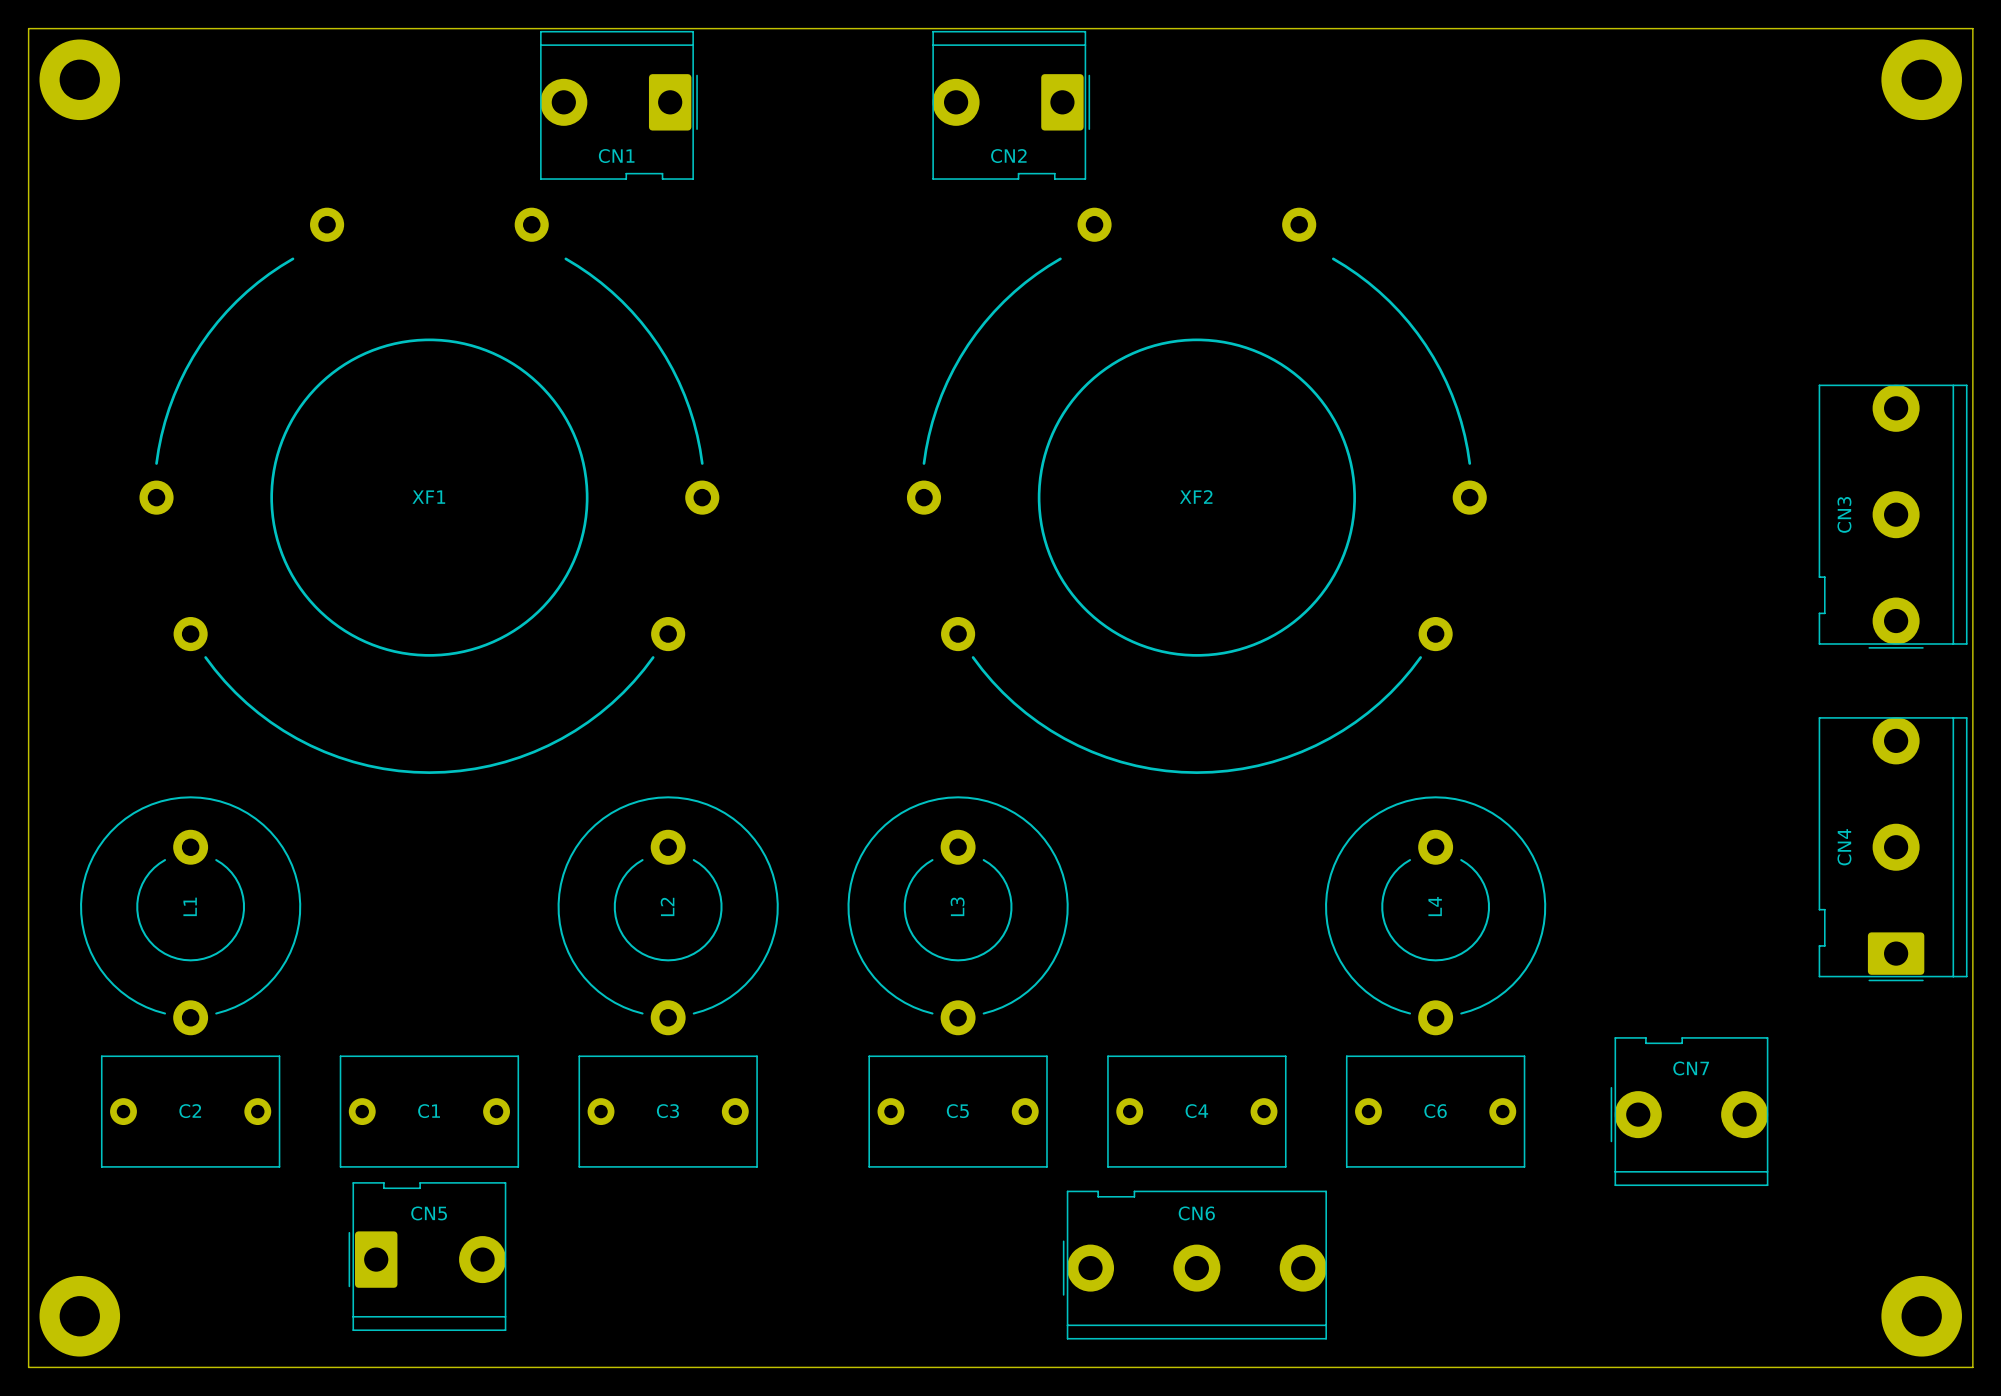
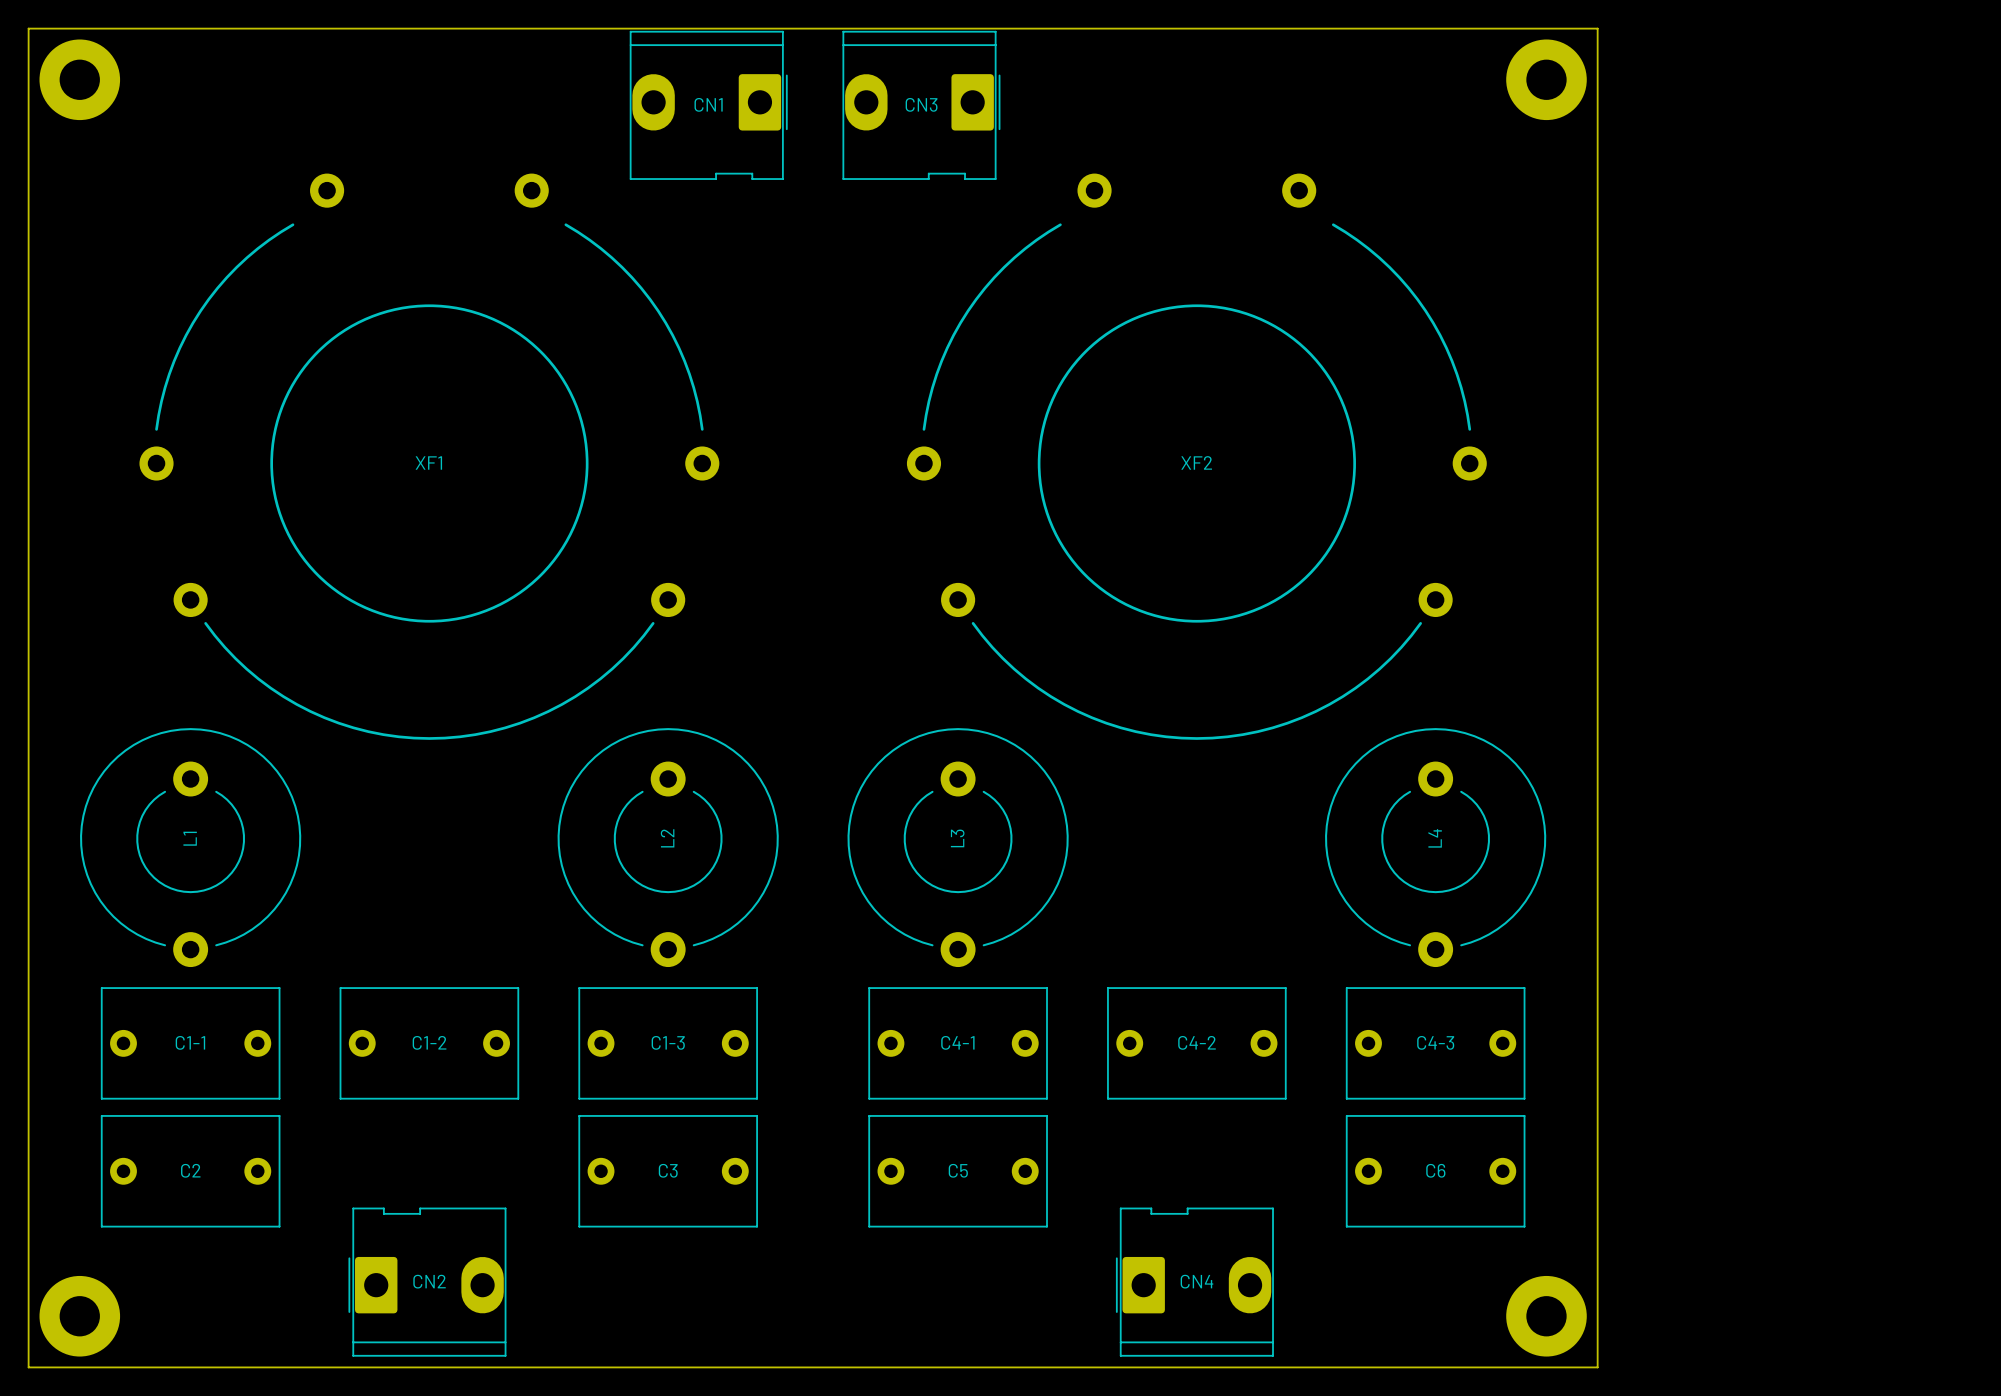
board edge: (1597, 28) (1972, 28) (1972, 1367) (1597, 1367) -> (1597, 28) (1597, 1367)
CN1 footprint: [540, 30, 698, 180] -> [629, 30, 788, 180]
CN2 footprint: [932, 30, 1091, 180] -> [348, 1207, 507, 1357]
part: none -> (1546, 79)
part: (1921, 79) -> none
CN1 name position: CN1 (616, 156) -> CN1 (708, 104)
CN2 name position: CN2 (1008, 156) -> CN2 (429, 1281)
CN3 footprint: [1818, 384, 1968, 649] -> [842, 30, 1001, 180]
XF1 position: (429, 490) -> (429, 456)
XF2 position: (1196, 490) -> (1196, 456)
CN3 name position: CN3 (1844, 514) -> CN3 (921, 104)
CN4 footprint: [1818, 717, 1968, 982] -> [1116, 1207, 1274, 1357]
CN4 name position: CN4 (1844, 847) -> CN4 (1196, 1281)
L1 position: (190, 915) -> (190, 847)
L2 position: (668, 915) -> (668, 847)
L3 position: (958, 915) -> (958, 847)
L4 position: (1435, 915) -> (1435, 847)
C1-1: none -> (190, 1043)
C1-2: none -> (429, 1043)
C1-3: none -> (668, 1043)
C4-1: none -> (958, 1043)
C4-2: none -> (1196, 1043)
C4-3: none -> (1435, 1043)
C2 position: (190, 1111) -> (190, 1171)
C1: (429, 1111) -> none
C3 position: (668, 1111) -> (668, 1171)
C5 position: (958, 1111) -> (958, 1171)
C4: (1196, 1111) -> none
C6 position: (1435, 1111) -> (1435, 1171)
CN7: (1689, 1111) -> none
CN5: (427, 1256) -> none
CN6: (1194, 1265) -> none
part: none -> (1546, 1316)
part: (1921, 1316) -> none

